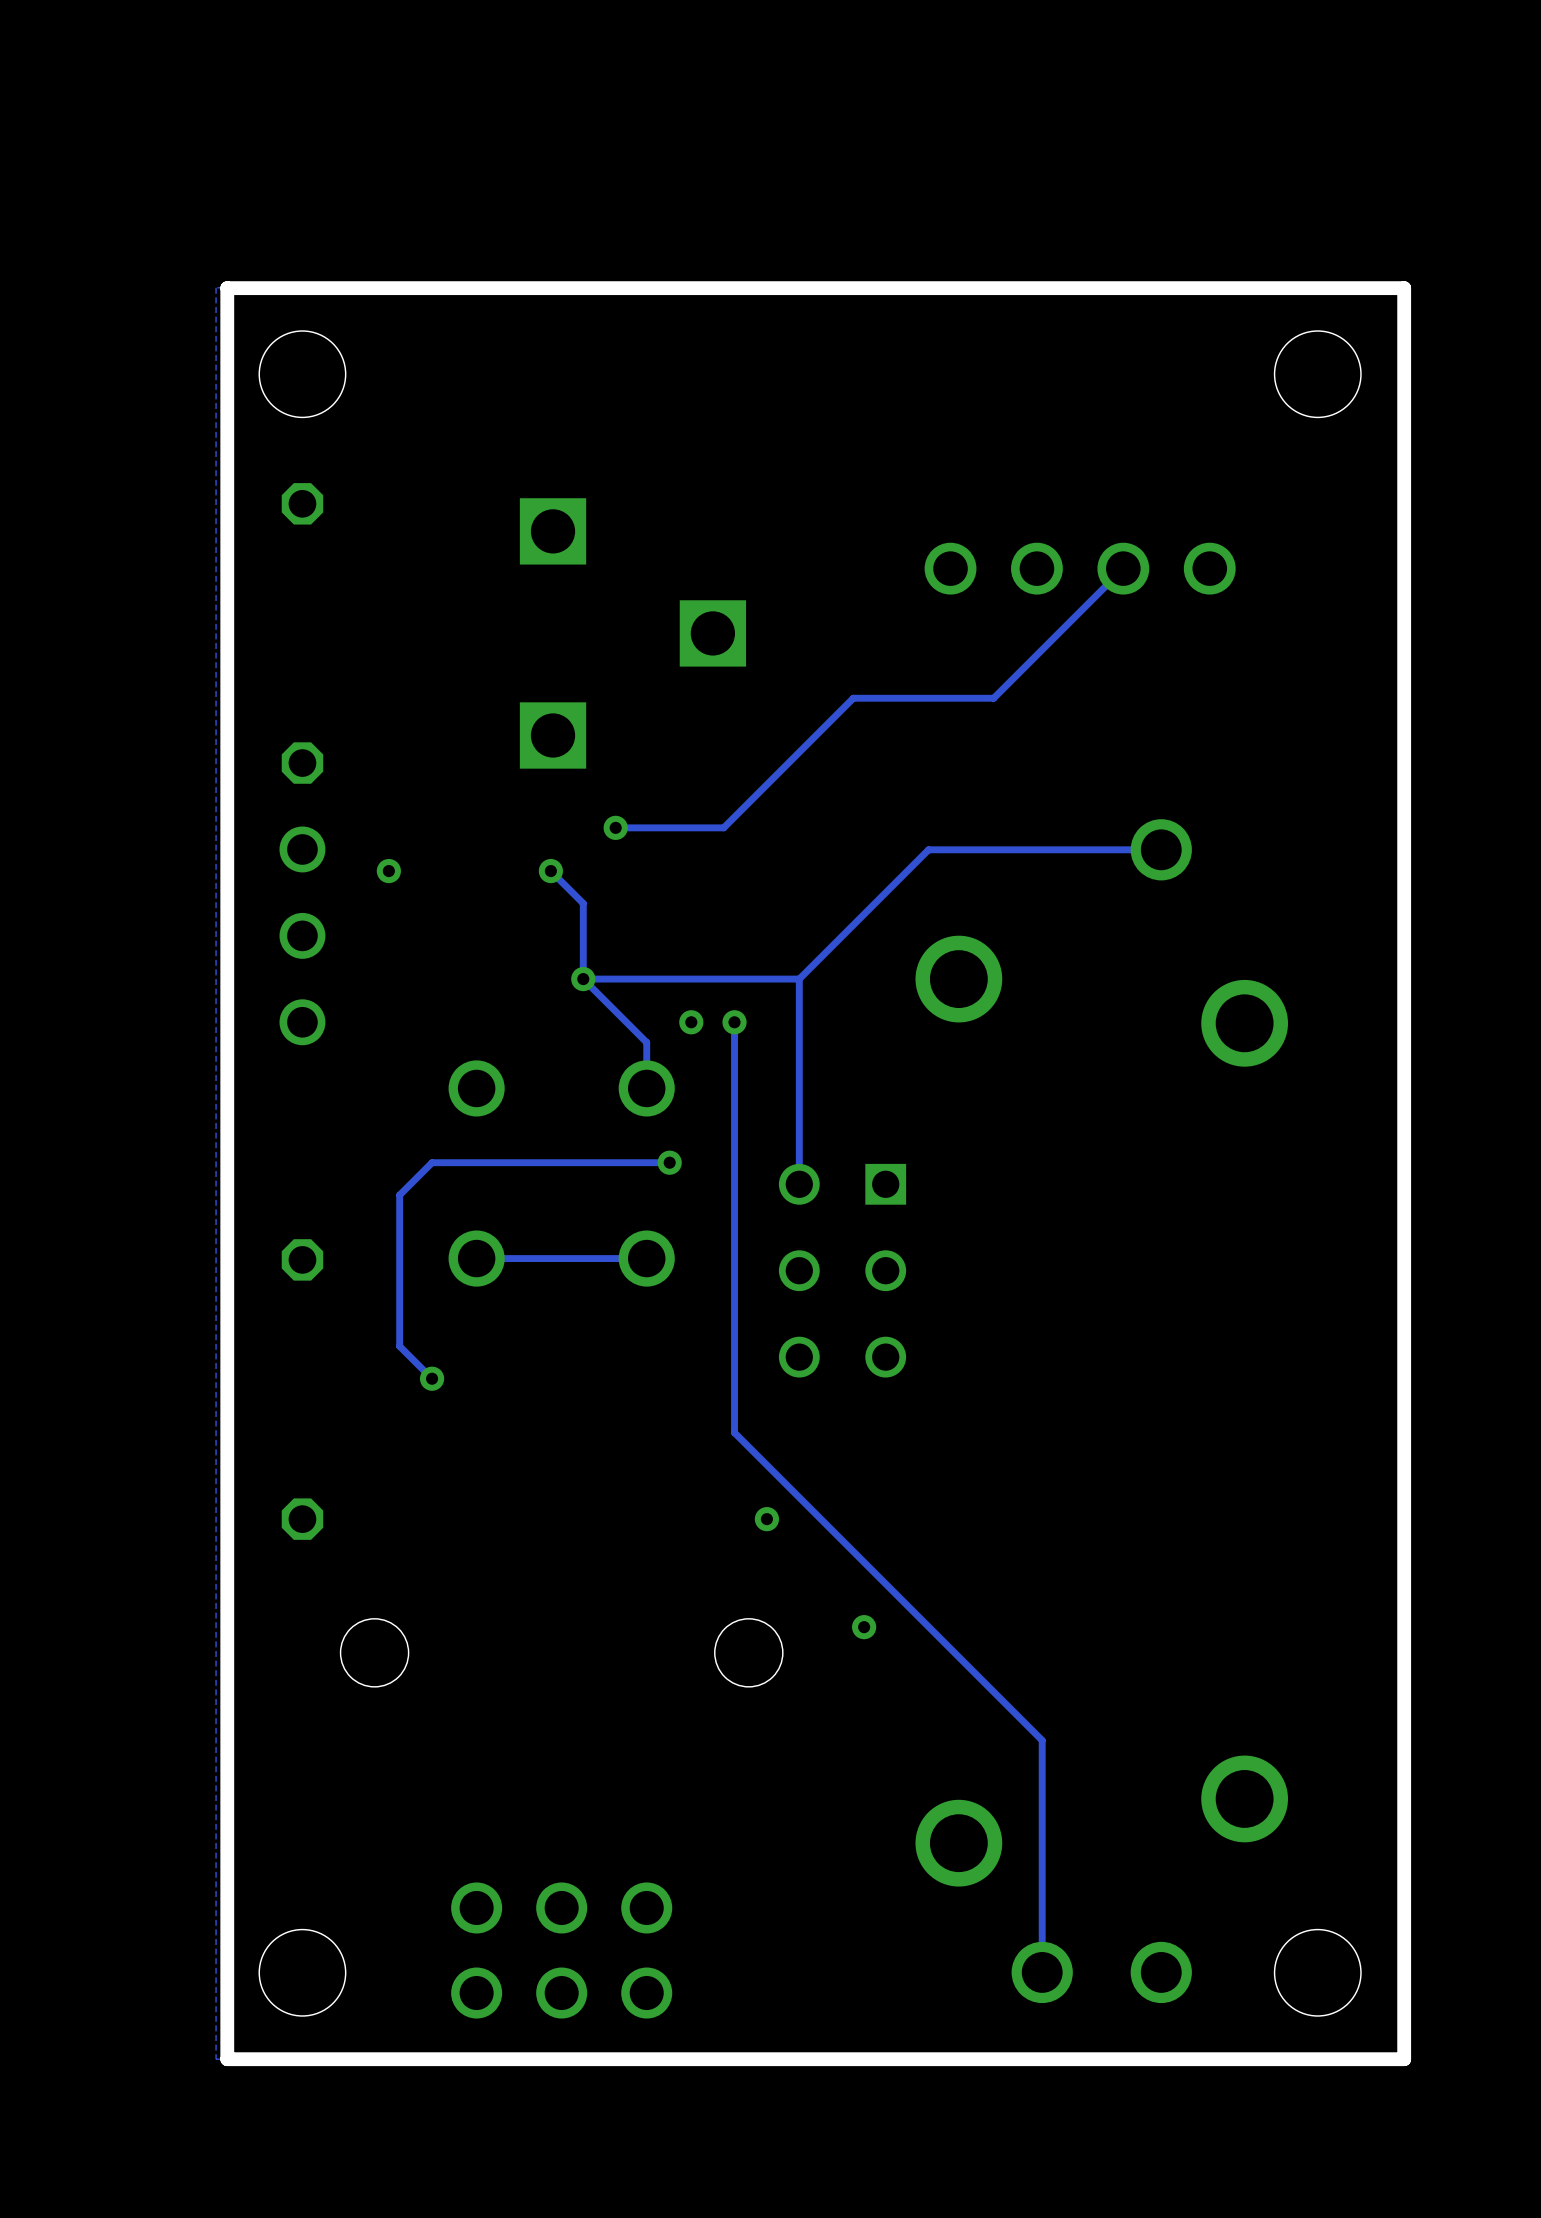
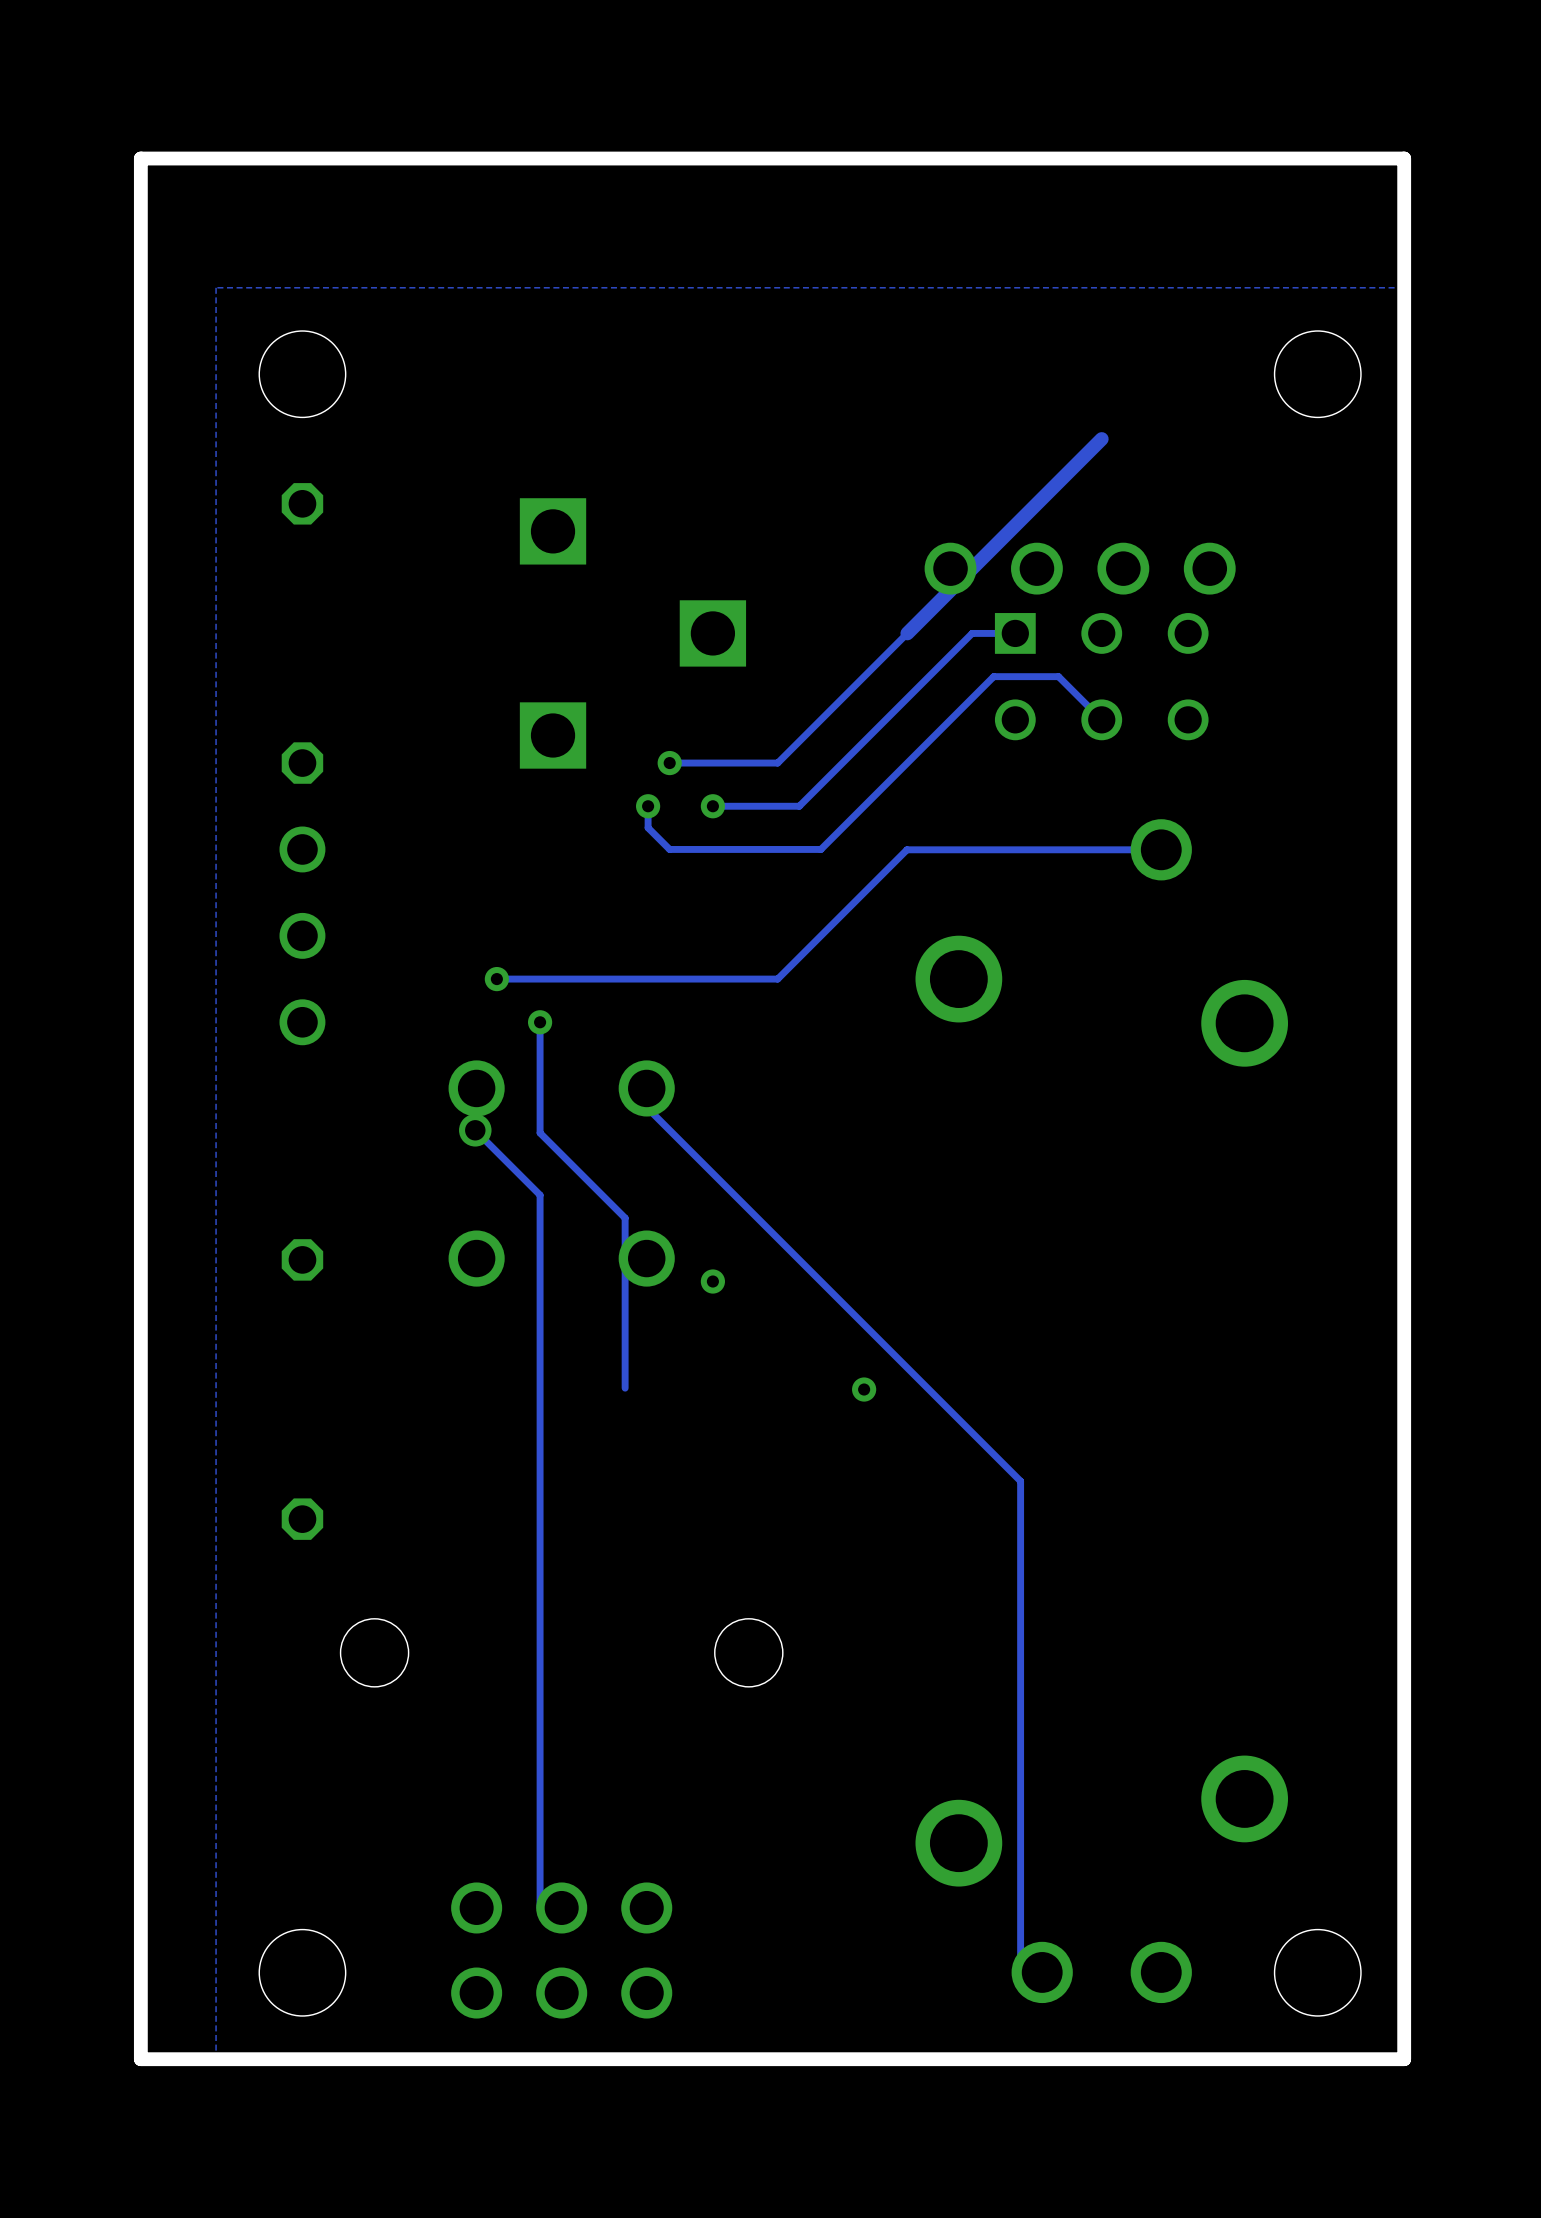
board edge: (1404, 288) (227, 288) (227, 2059) -> (1404, 288) (1404, 158) (140, 158) (140, 2059) (227, 2059)
track: none -> (1101, 439) (777, 763) (669, 763)
track: (1123, 568) (993, 698) (853, 698) (723, 827) (615, 827) -> none
track: none -> (1015, 633) (972, 633) (799, 806) (712, 806)
track: none -> (1101, 719) (1058, 676) (993, 676) (820, 849) (669, 849) (648, 827) (648, 806)
via: none -> (669, 763)
via: none -> (712, 806)
via position: (615, 827) -> (648, 806)
track: (928, 849) (799, 979) -> (928, 849) (906, 849) (777, 979)
via: (388, 871) -> none
track: (550, 871) (583, 903) (583, 979) (646, 1042) (646, 1088) -> none
via: (550, 871) -> none
via: none -> (496, 979)
track: none -> (583, 979) (496, 979)
via: (583, 979) -> none
track: (799, 979) (777, 979) -> none
track: (799, 979) (799, 1184) -> none
track: none -> (540, 1022) (540, 1133) (625, 1218) (625, 1388)
via: none -> (540, 1022)
via: (691, 1022) -> none
track: (734, 1022) (734, 1432) (1042, 1740) (1042, 1972) -> none
via: (734, 1022) -> none
track: none -> (648, 1065) (648, 1108) (1020, 1481) (1020, 1972)
track: none -> (475, 1130) (540, 1195) (540, 1907)
via: none -> (475, 1130)
track: (669, 1162) (432, 1162) (399, 1195) (399, 1346) (432, 1378) -> none
via: (669, 1162) -> none
track: (646, 1258) (476, 1258) -> none
part rotation: 0° (842, 1270) -> 90° counterclockwise (1101, 676)
part position: (842, 1270) -> (1101, 676)
via: none -> (712, 1281)
via: (432, 1378) -> none
via: none -> (864, 1389)
via: (766, 1519) -> none
via: (864, 1627) -> none

